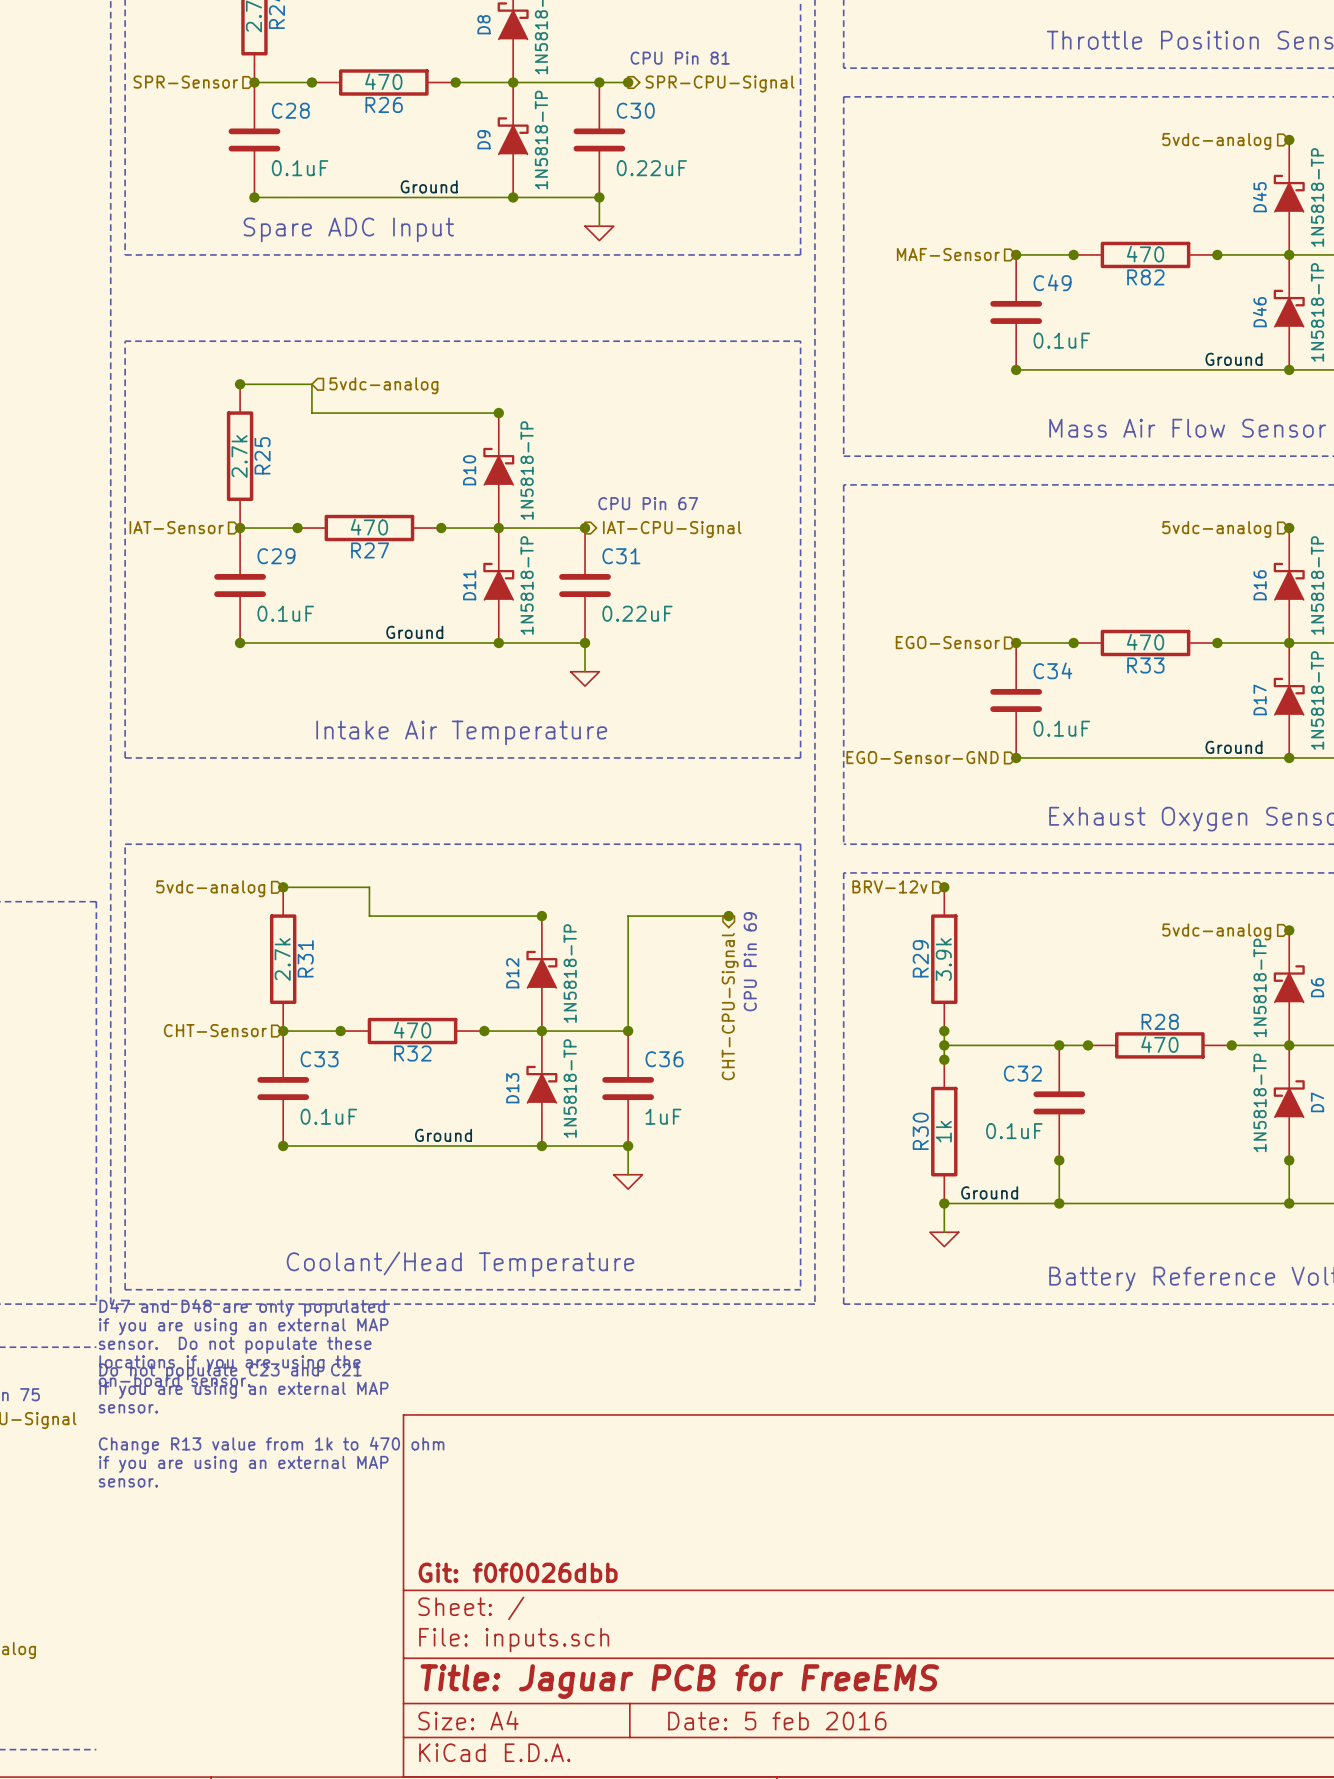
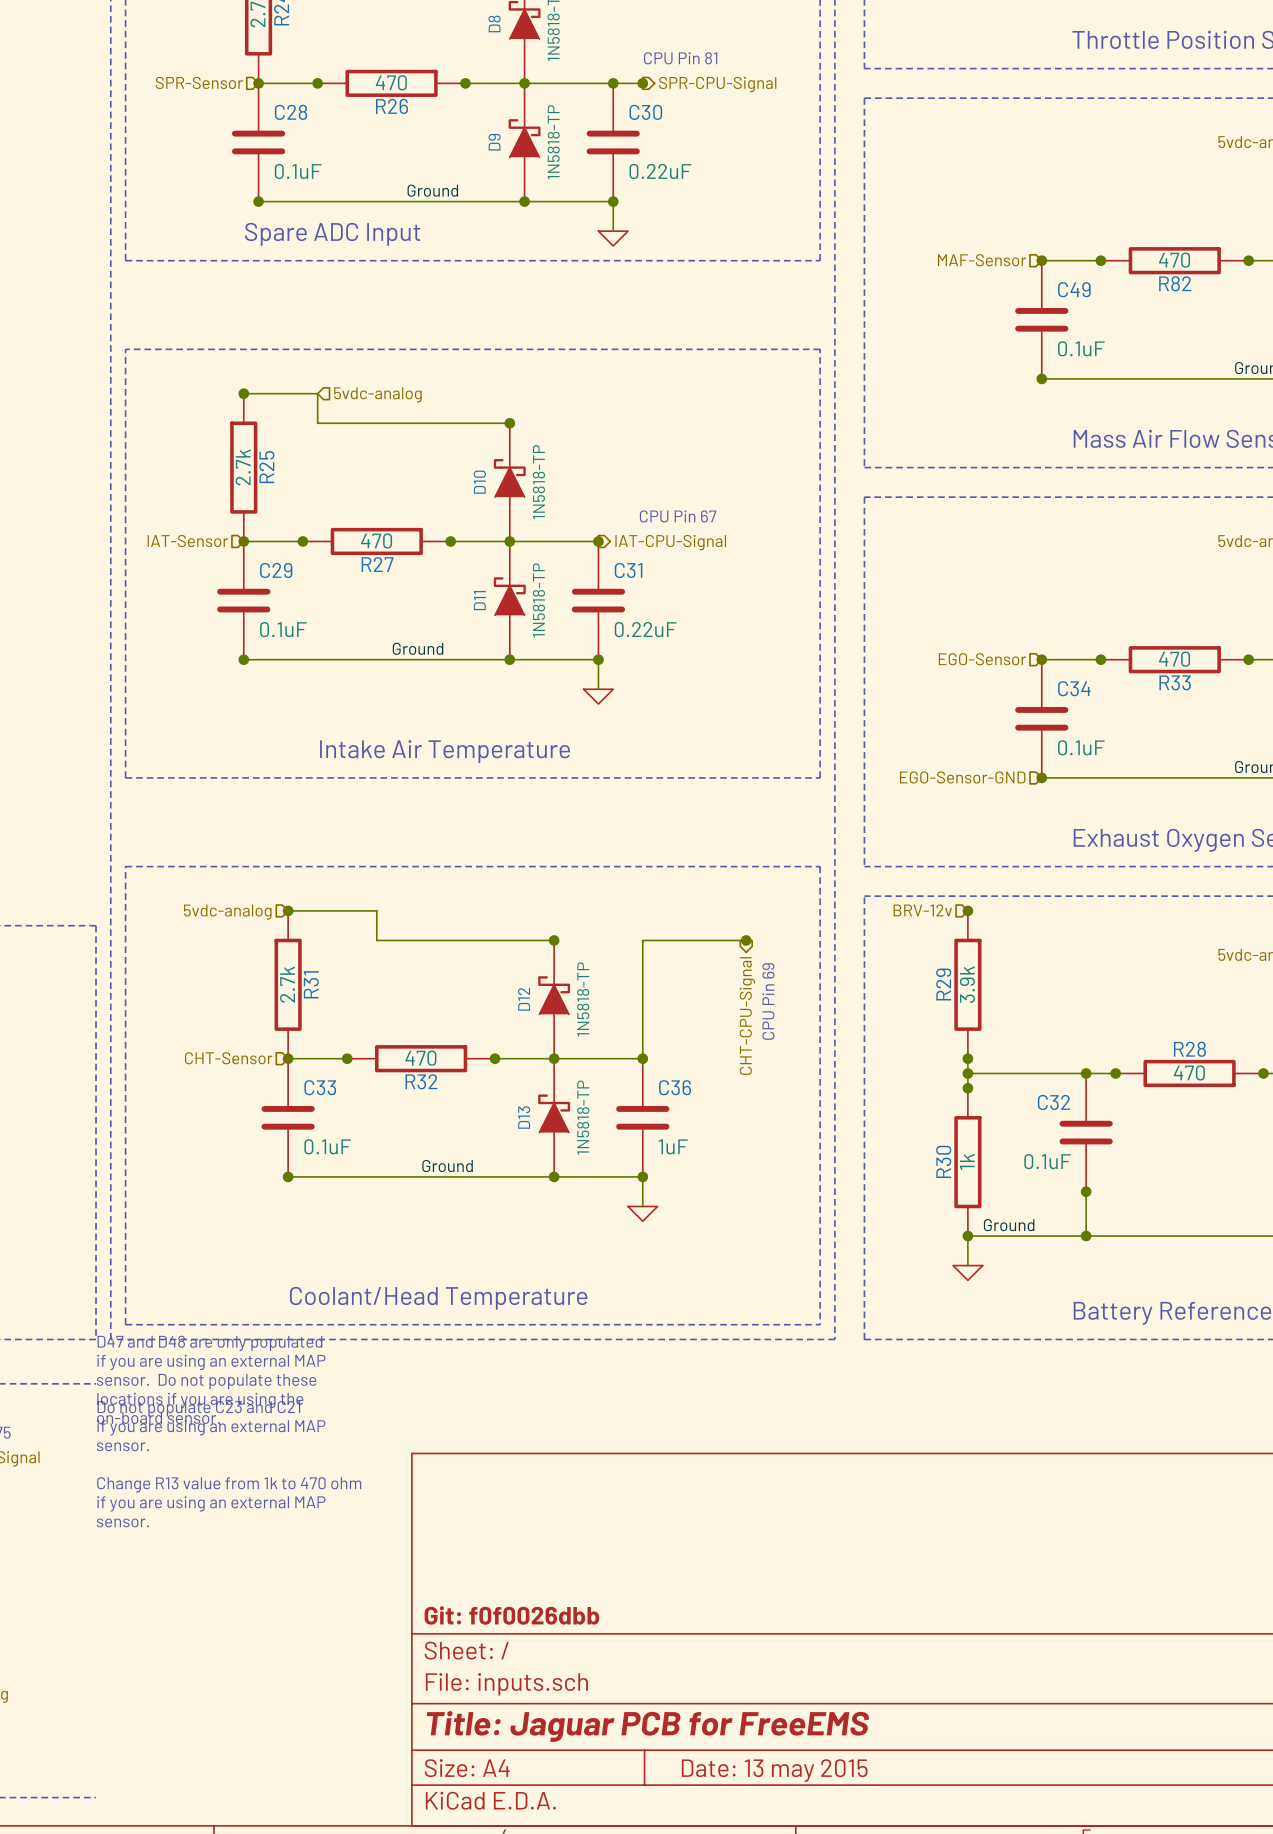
title block: Date: 5 feb 2016 (777, 1721) -> Date: 13 may 2015 (774, 1770)

